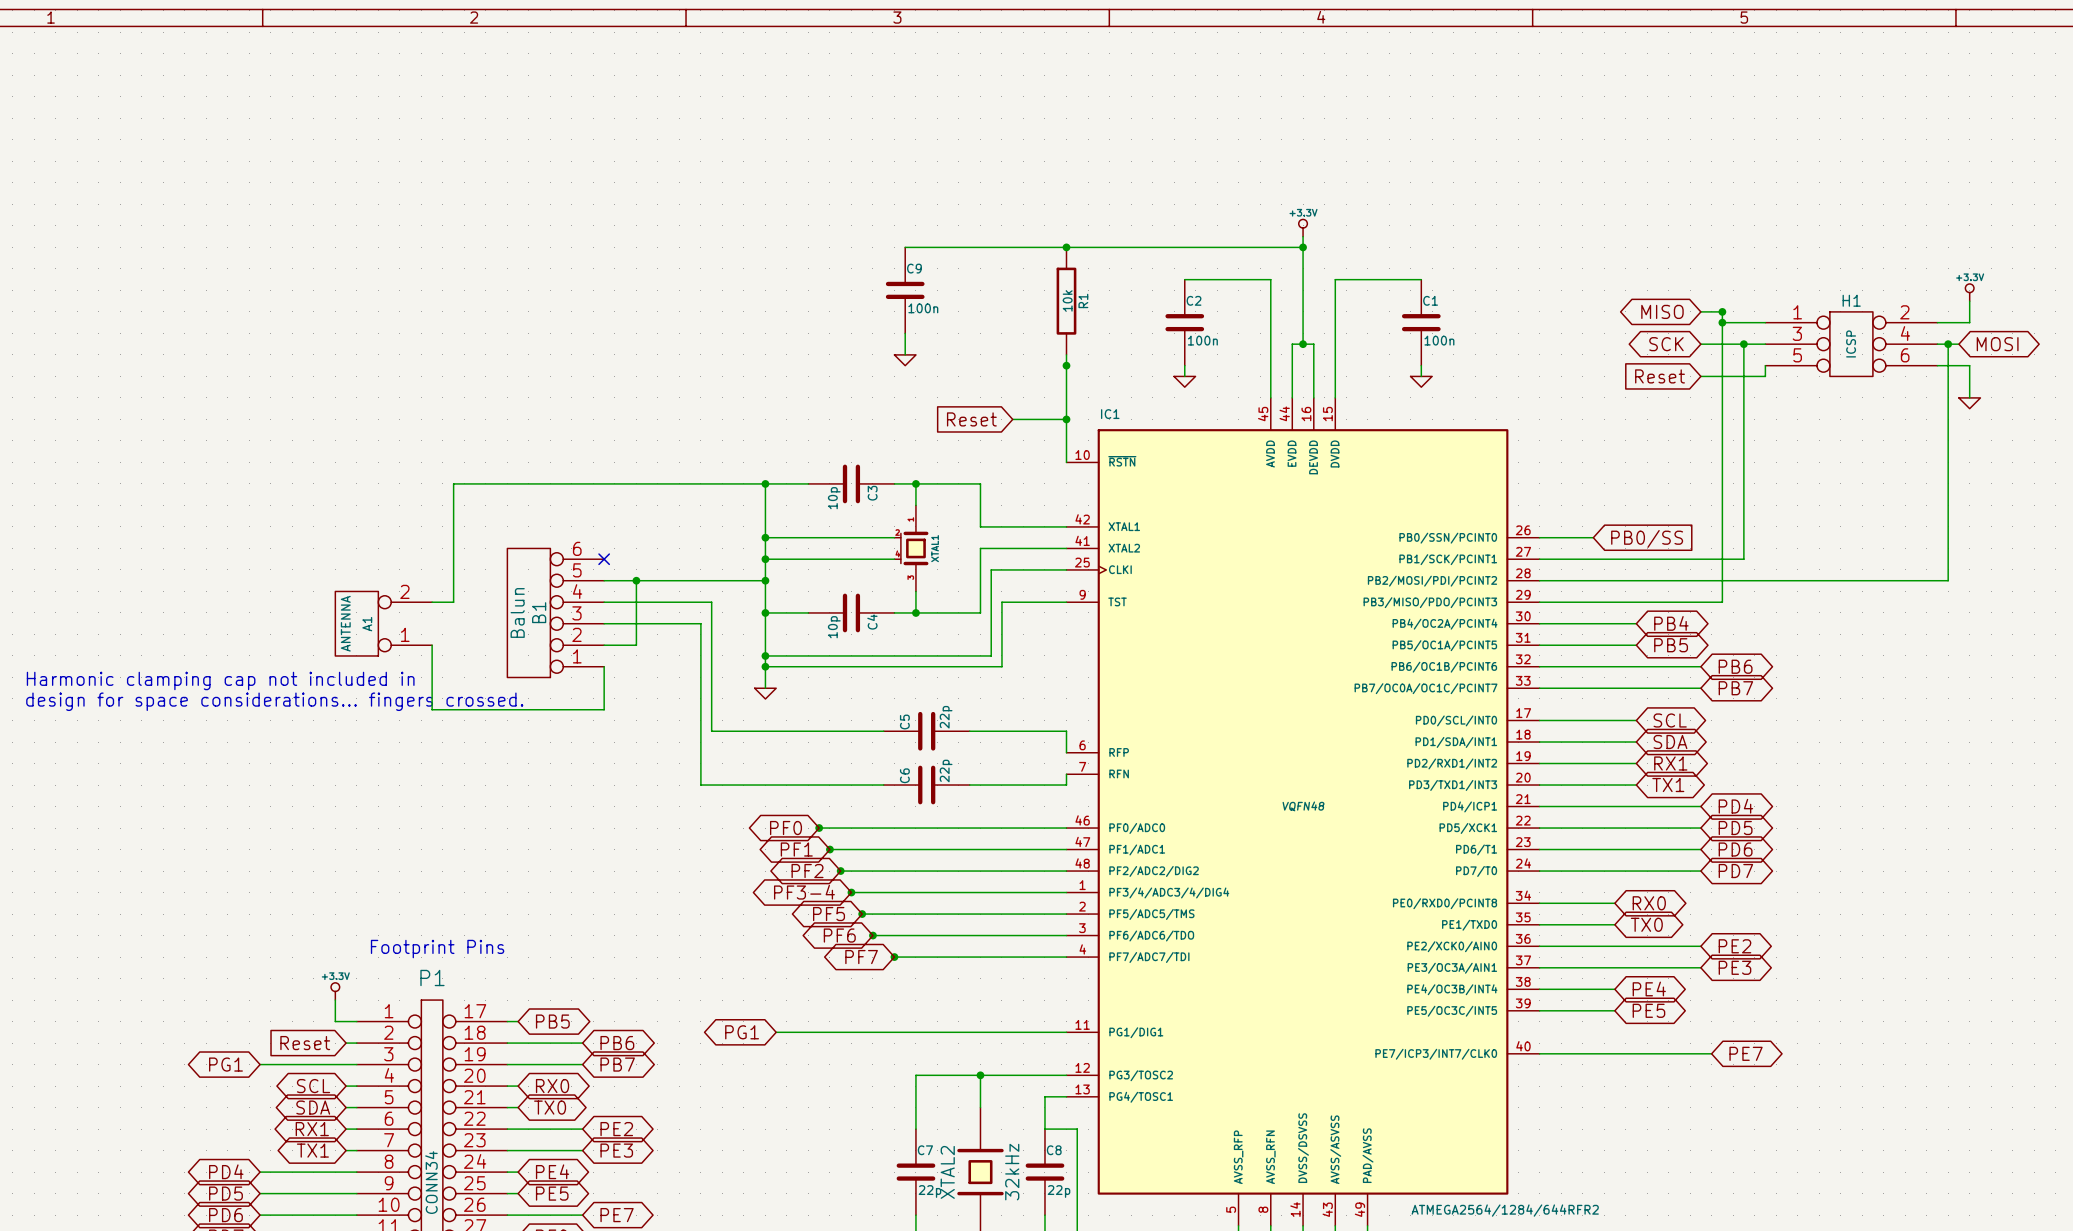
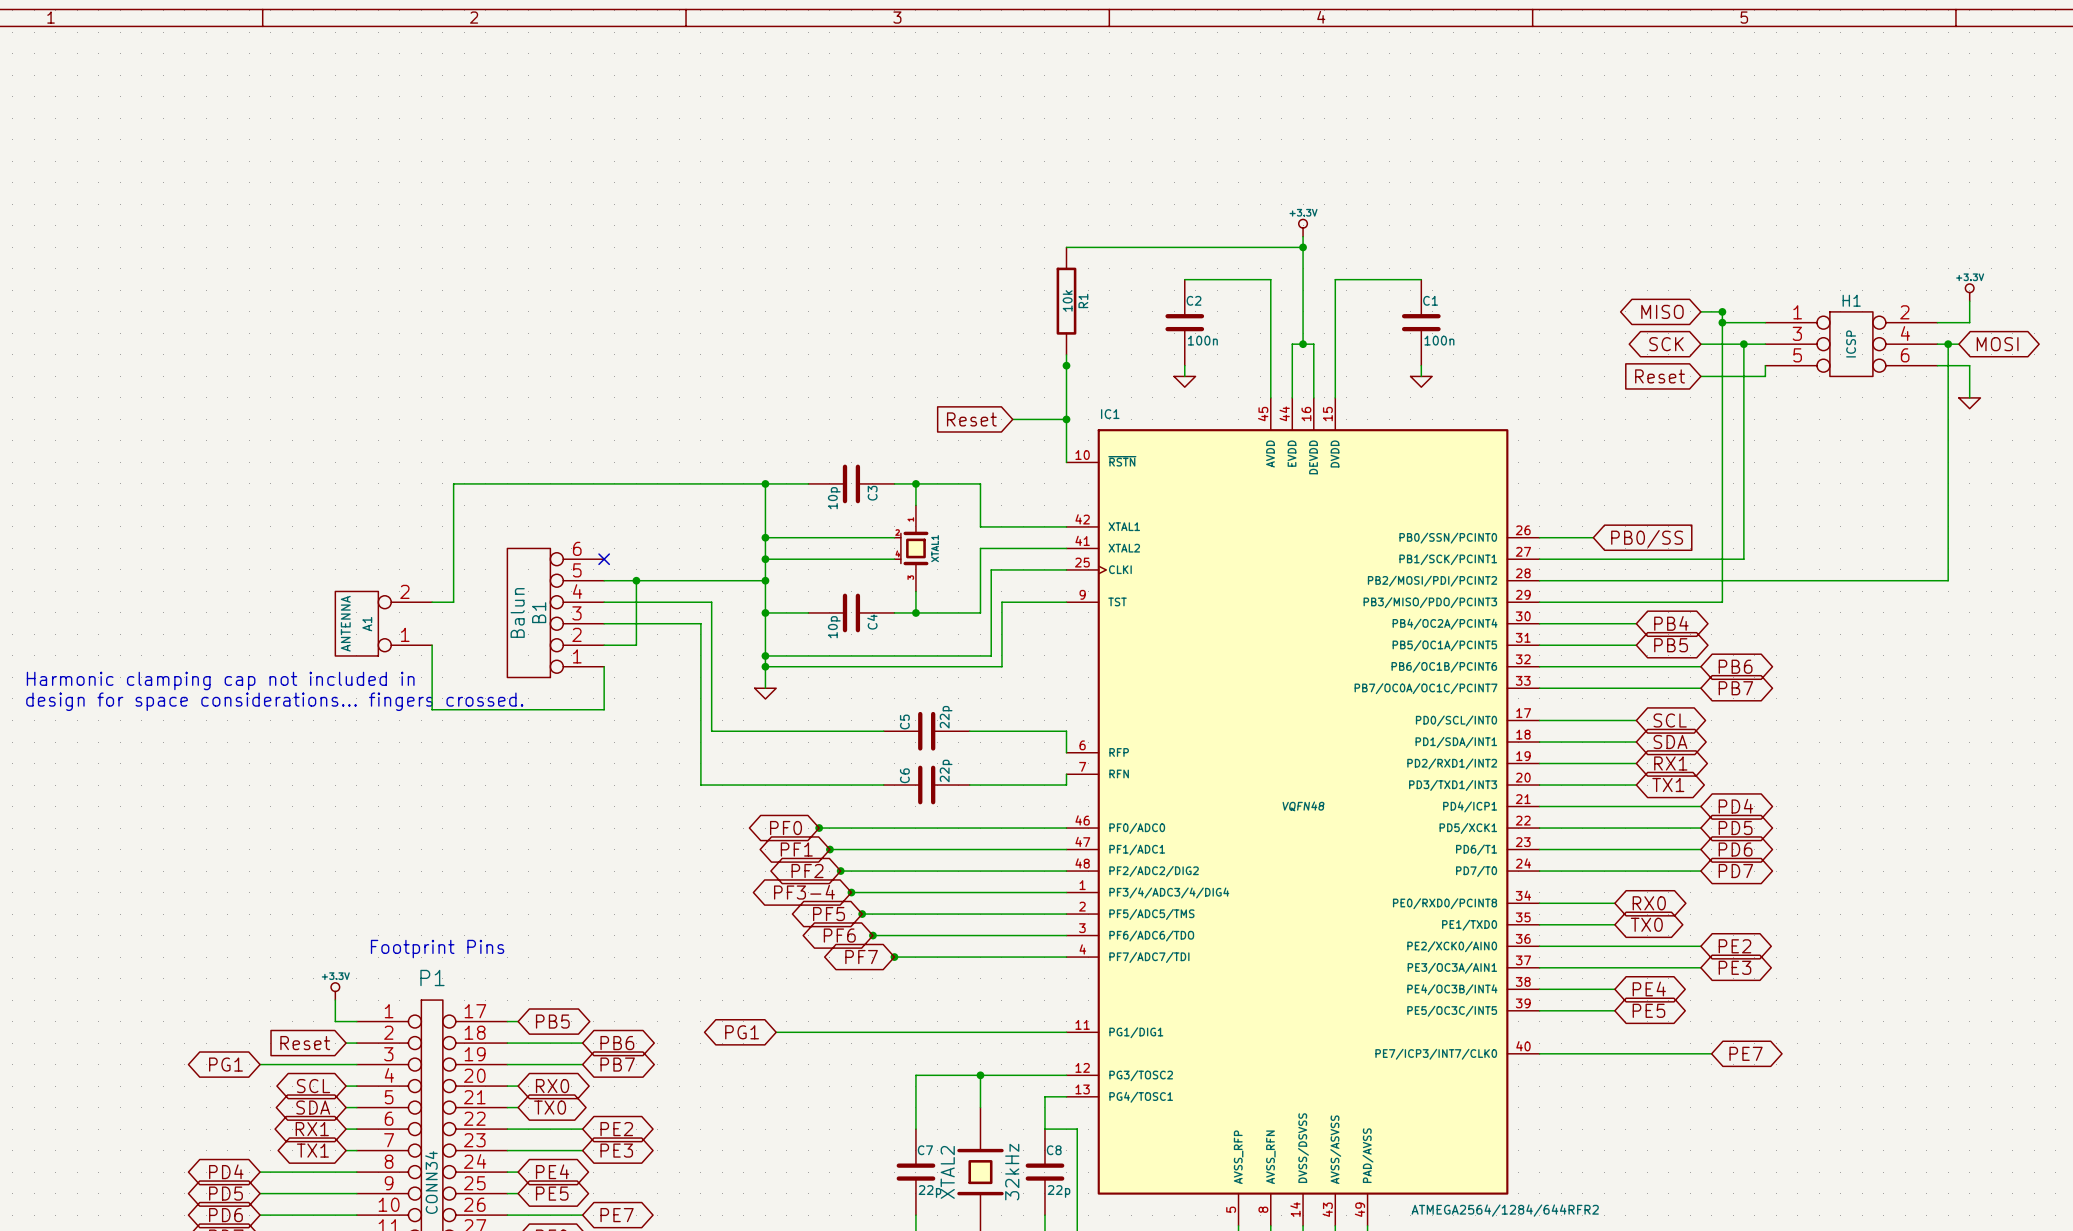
wire: (905, 247) (1066, 247) -> none
junction: (1066, 247) -> none
C9: 100n (905, 290) -> none
wire: (905, 333) (905, 354) -> none
power symbol: (905, 360) -> none

